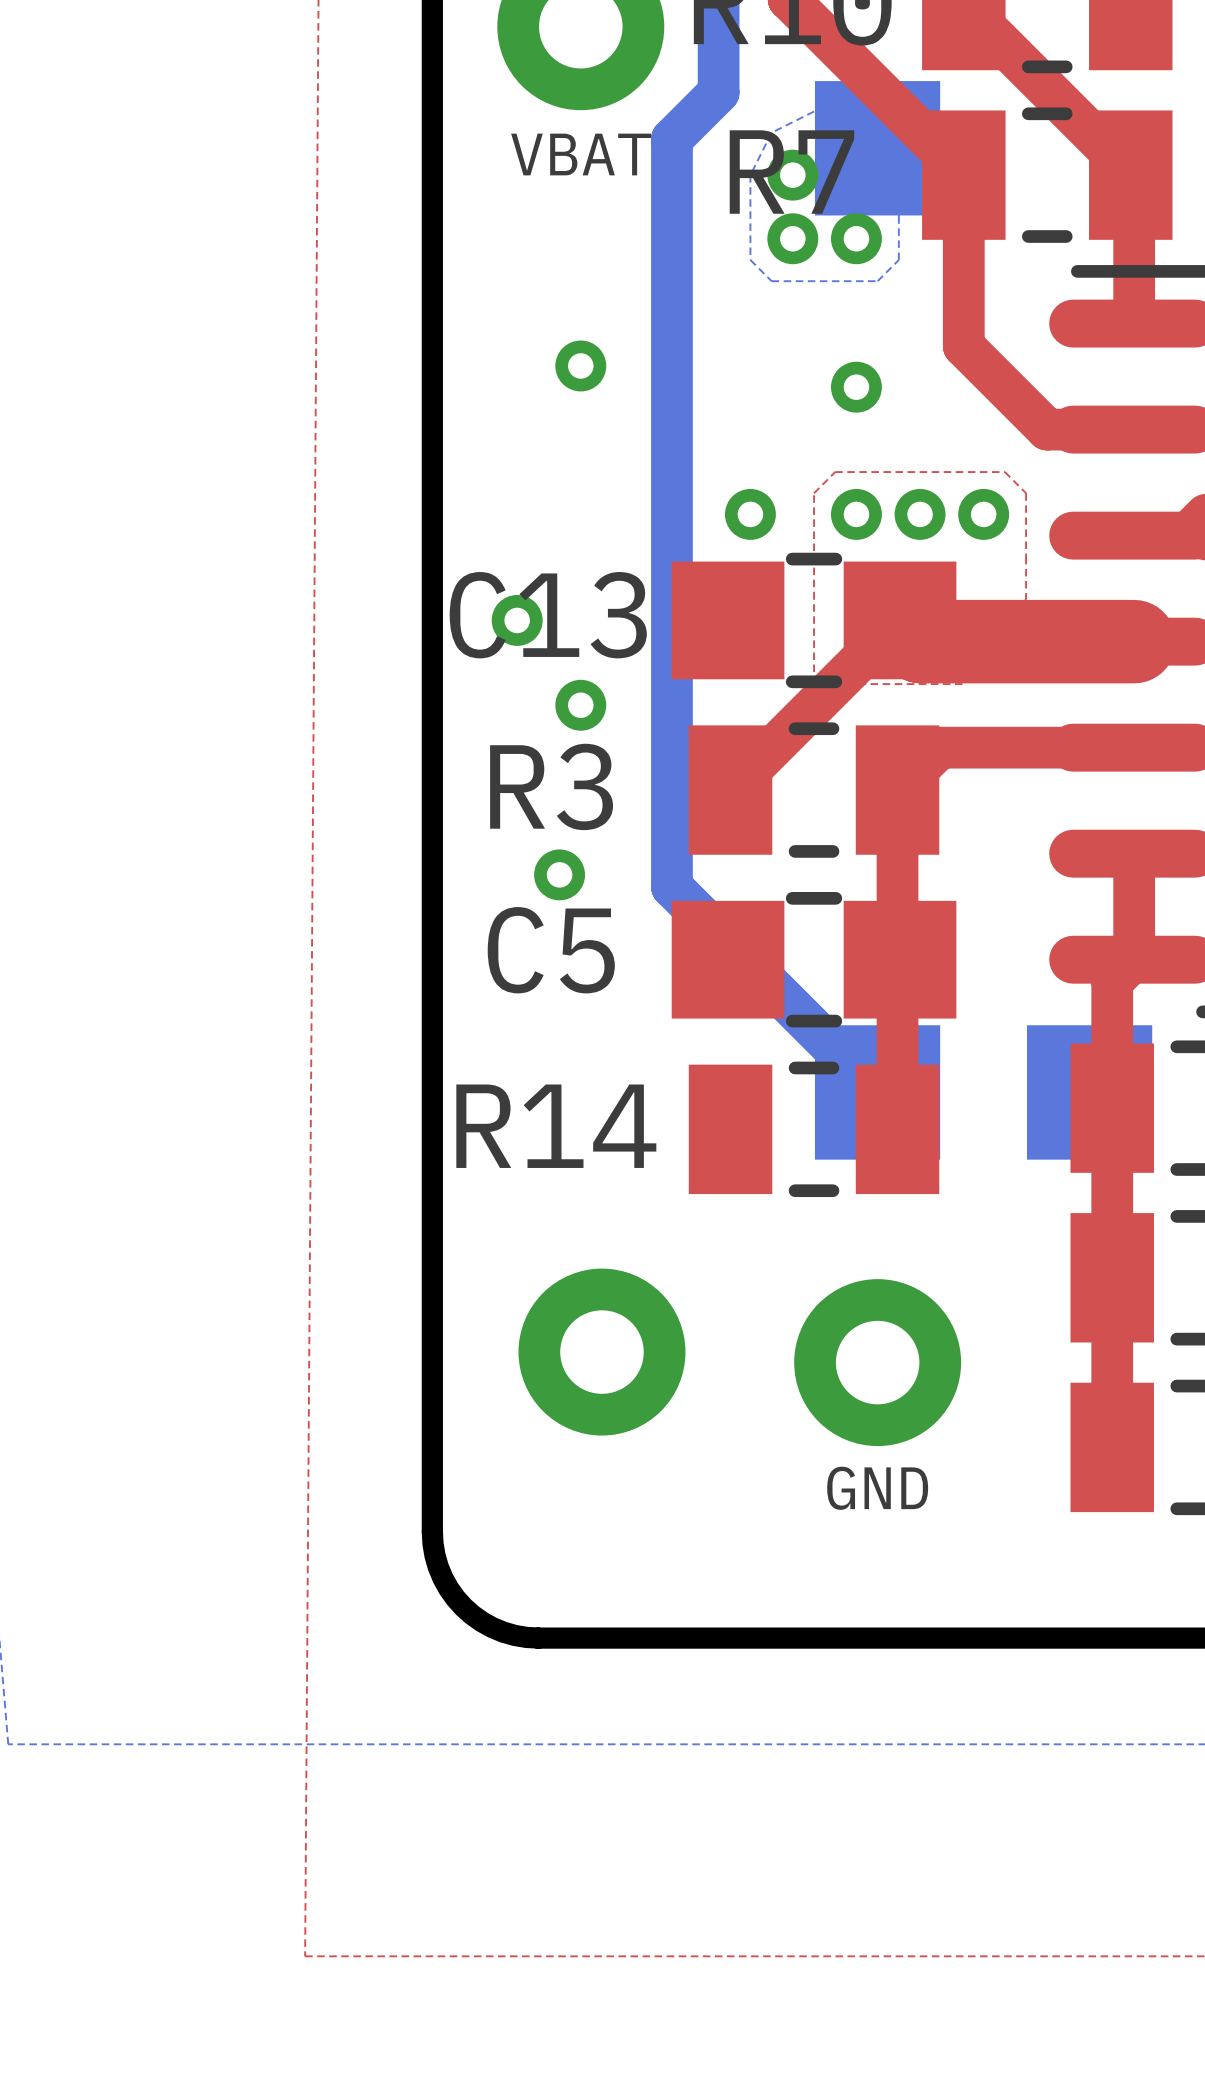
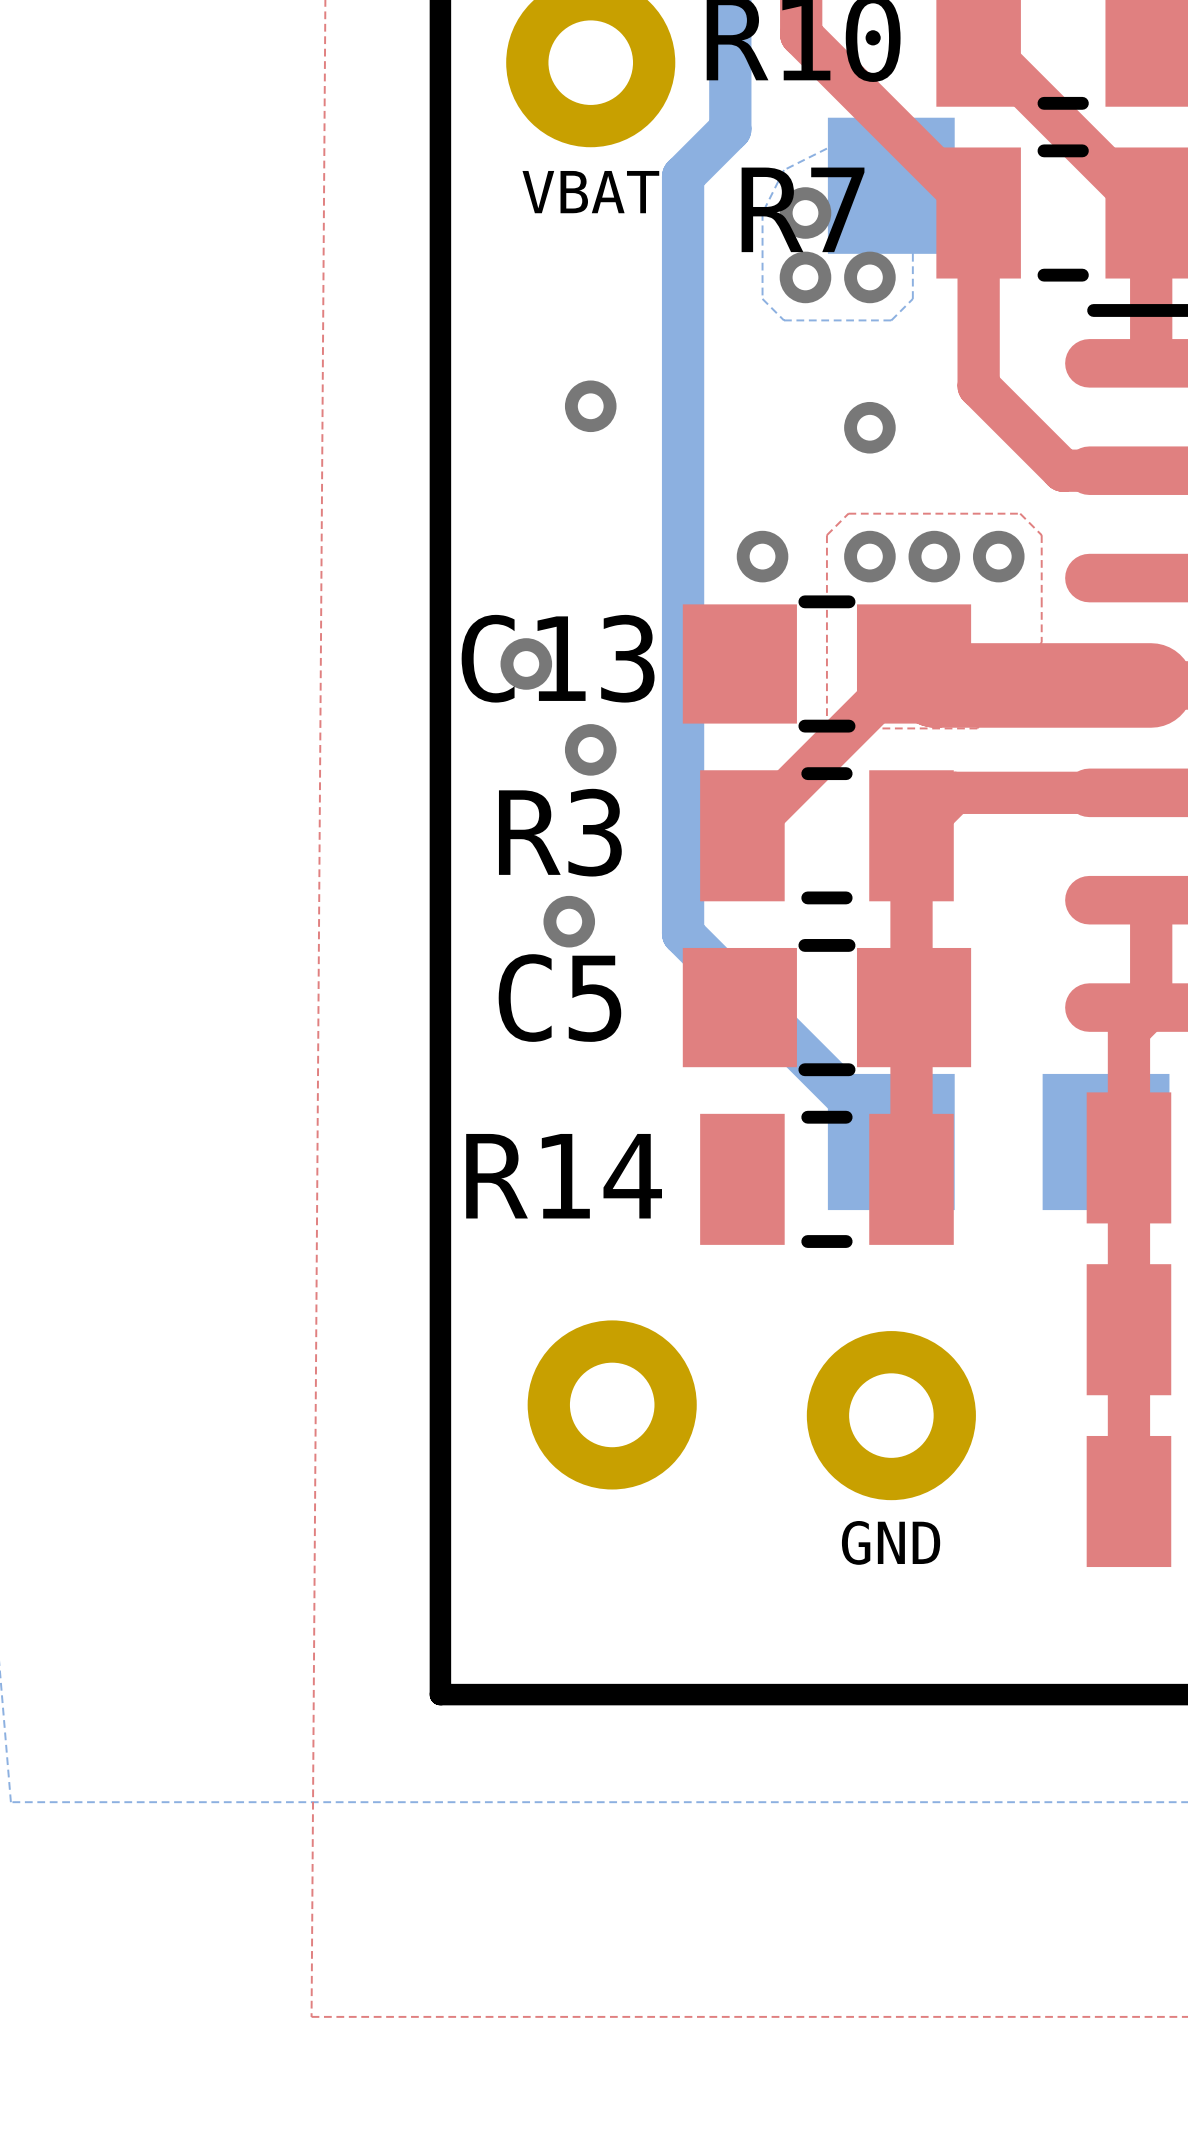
board edge: (432, 1532) (438, 1567) (448, 1588) (463, 1607) (492, 1627) (514, 1635) (538, 1638) -> (440, 1587) (440, 1694) (547, 1694)

